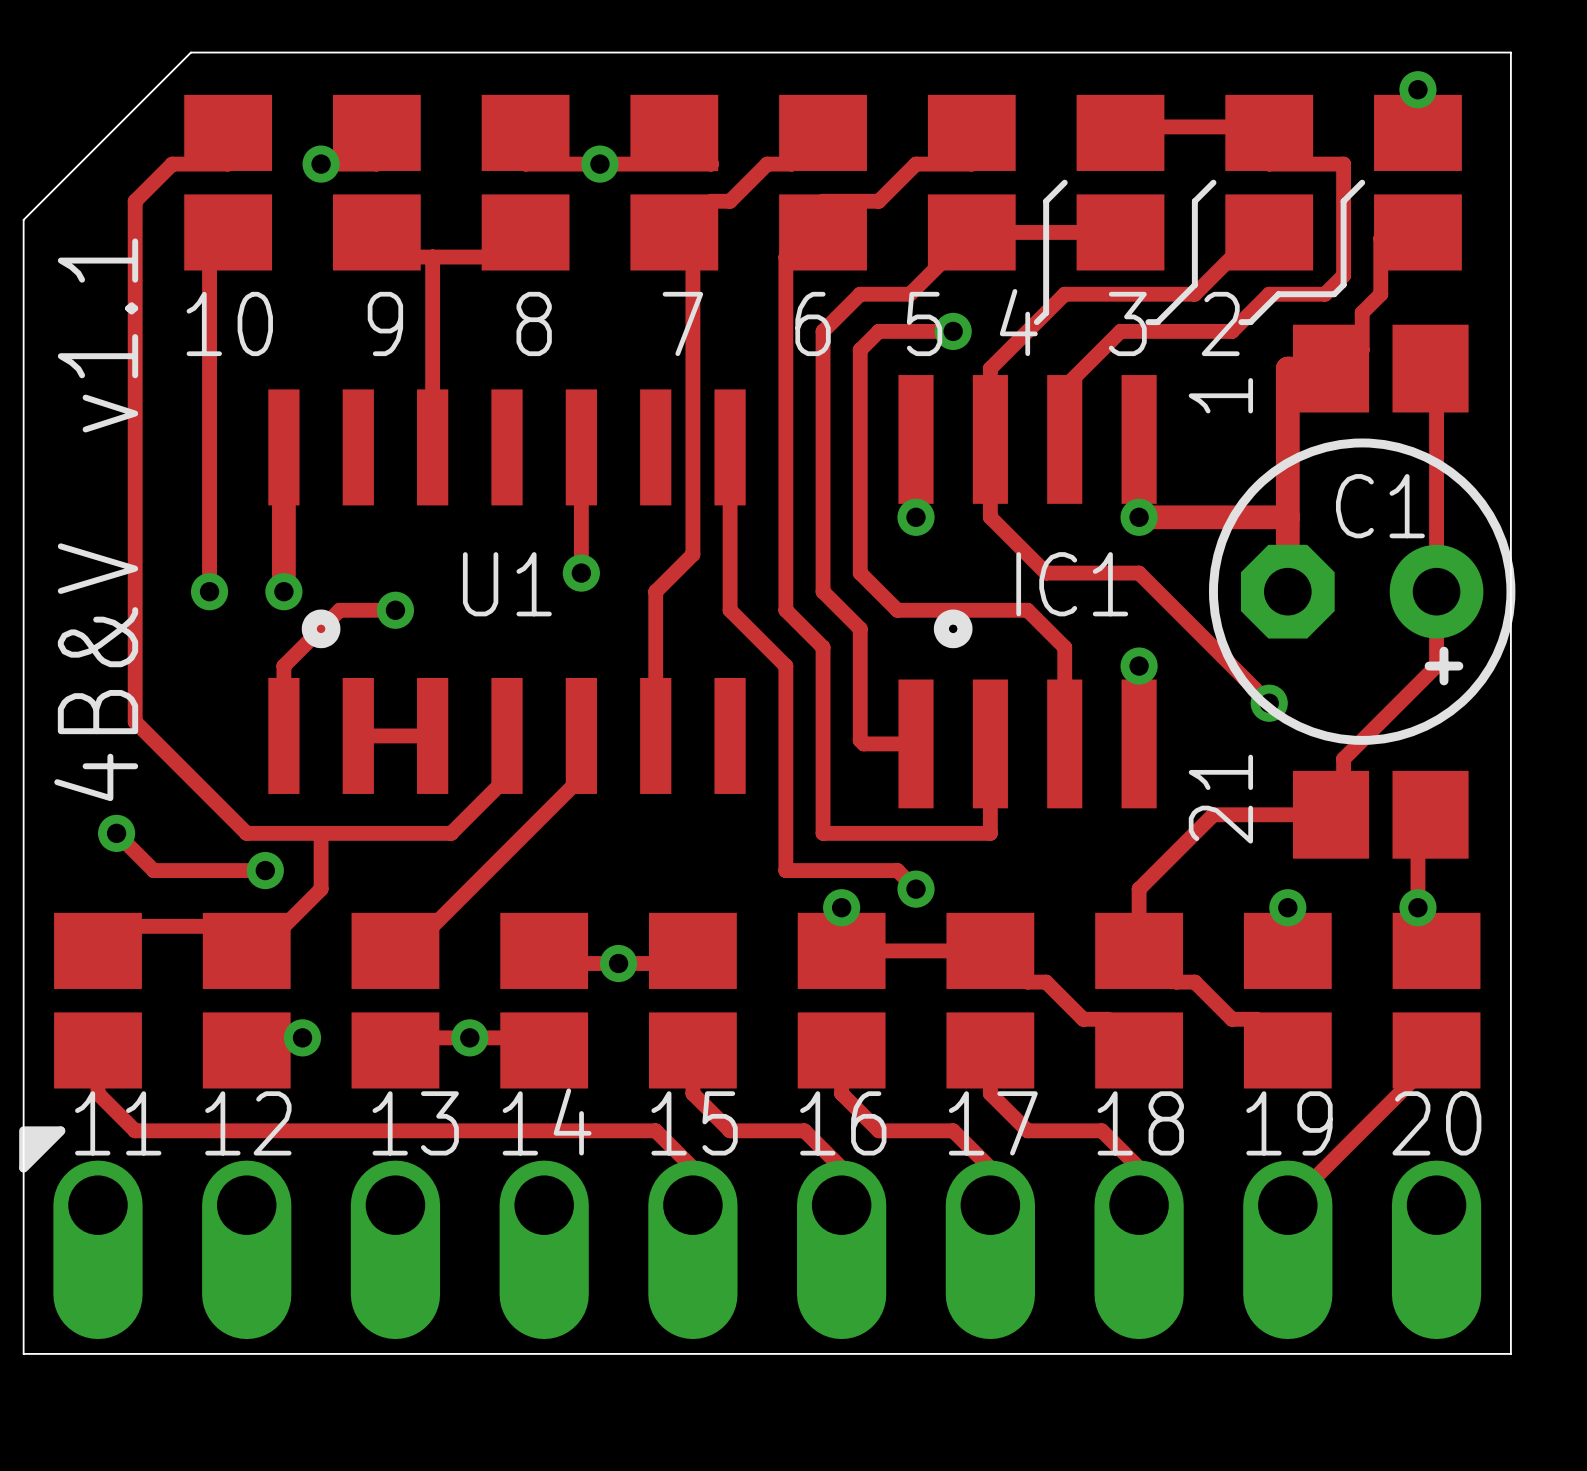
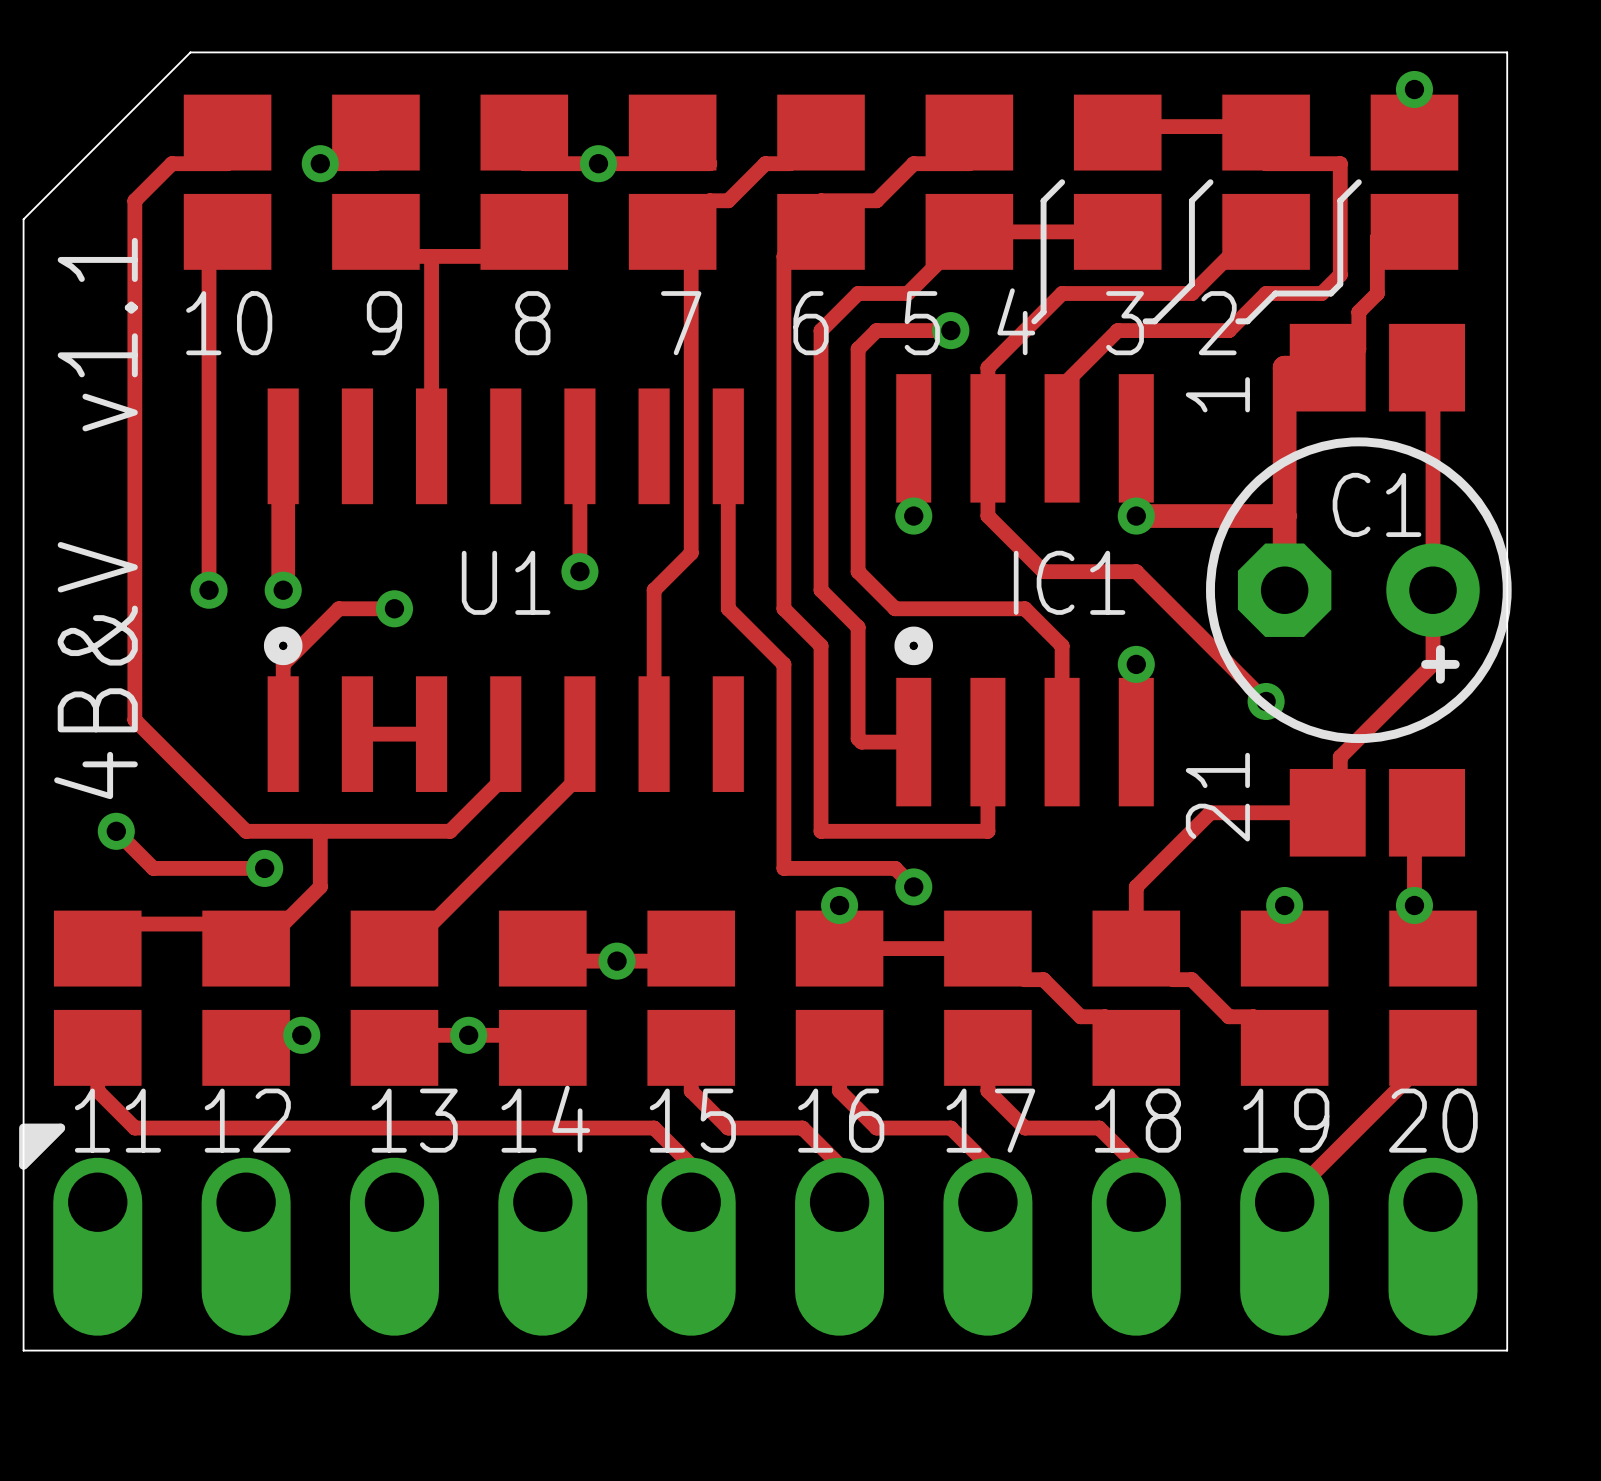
drawing position: (321, 628) -> (283, 645)
drawing position: (953, 628) -> (913, 645)

